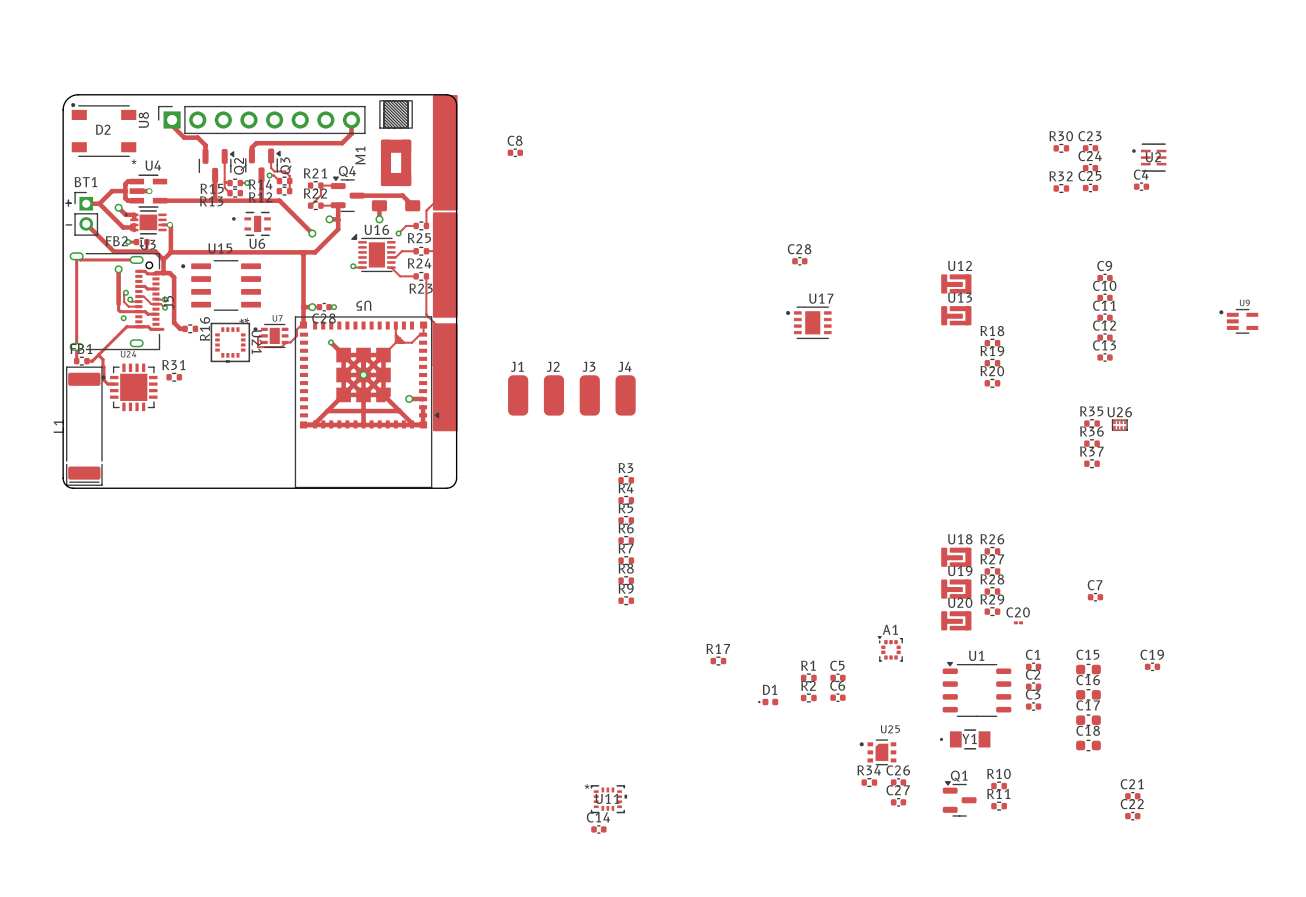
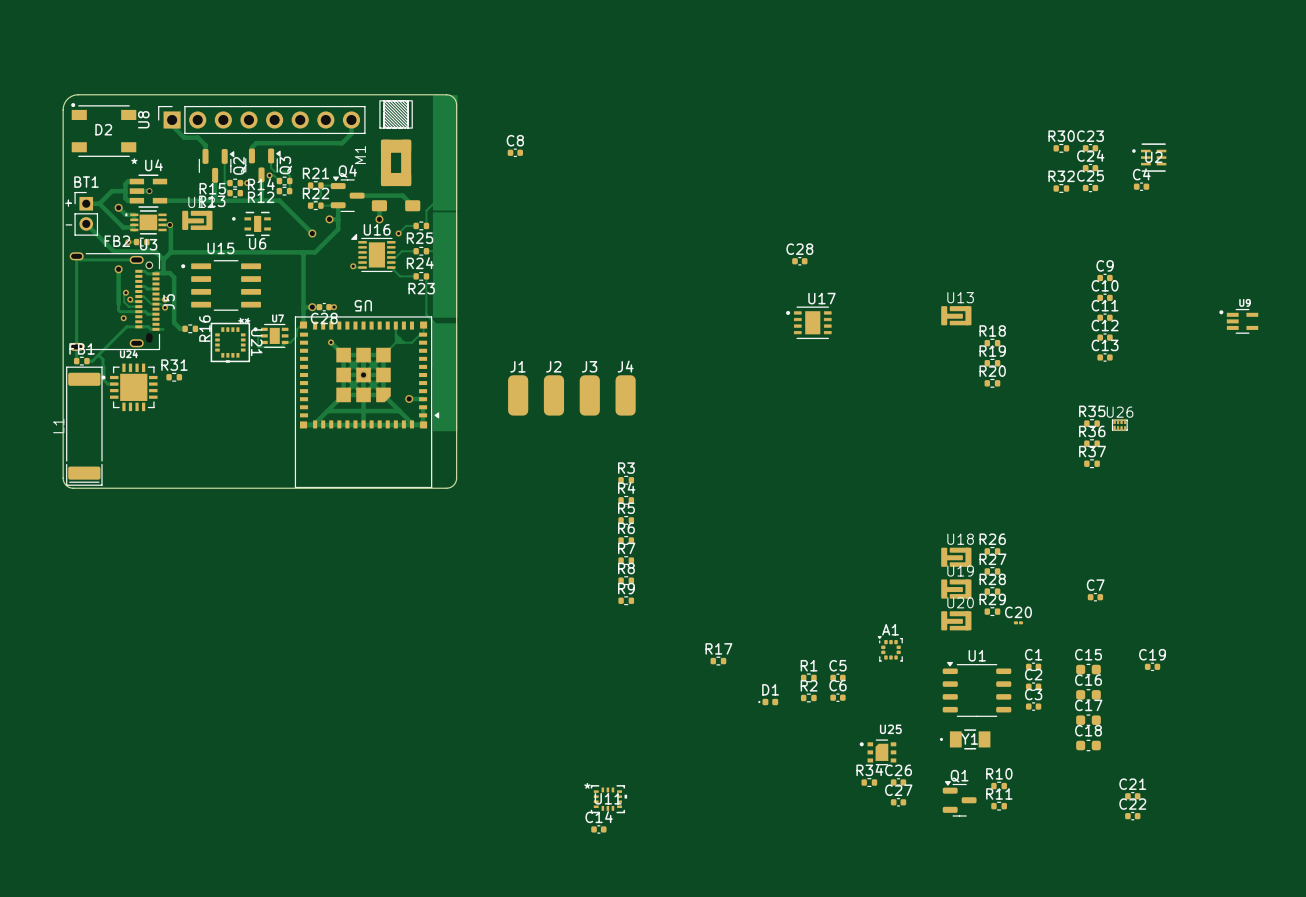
U12 position: (956, 283) -> (197, 220)

